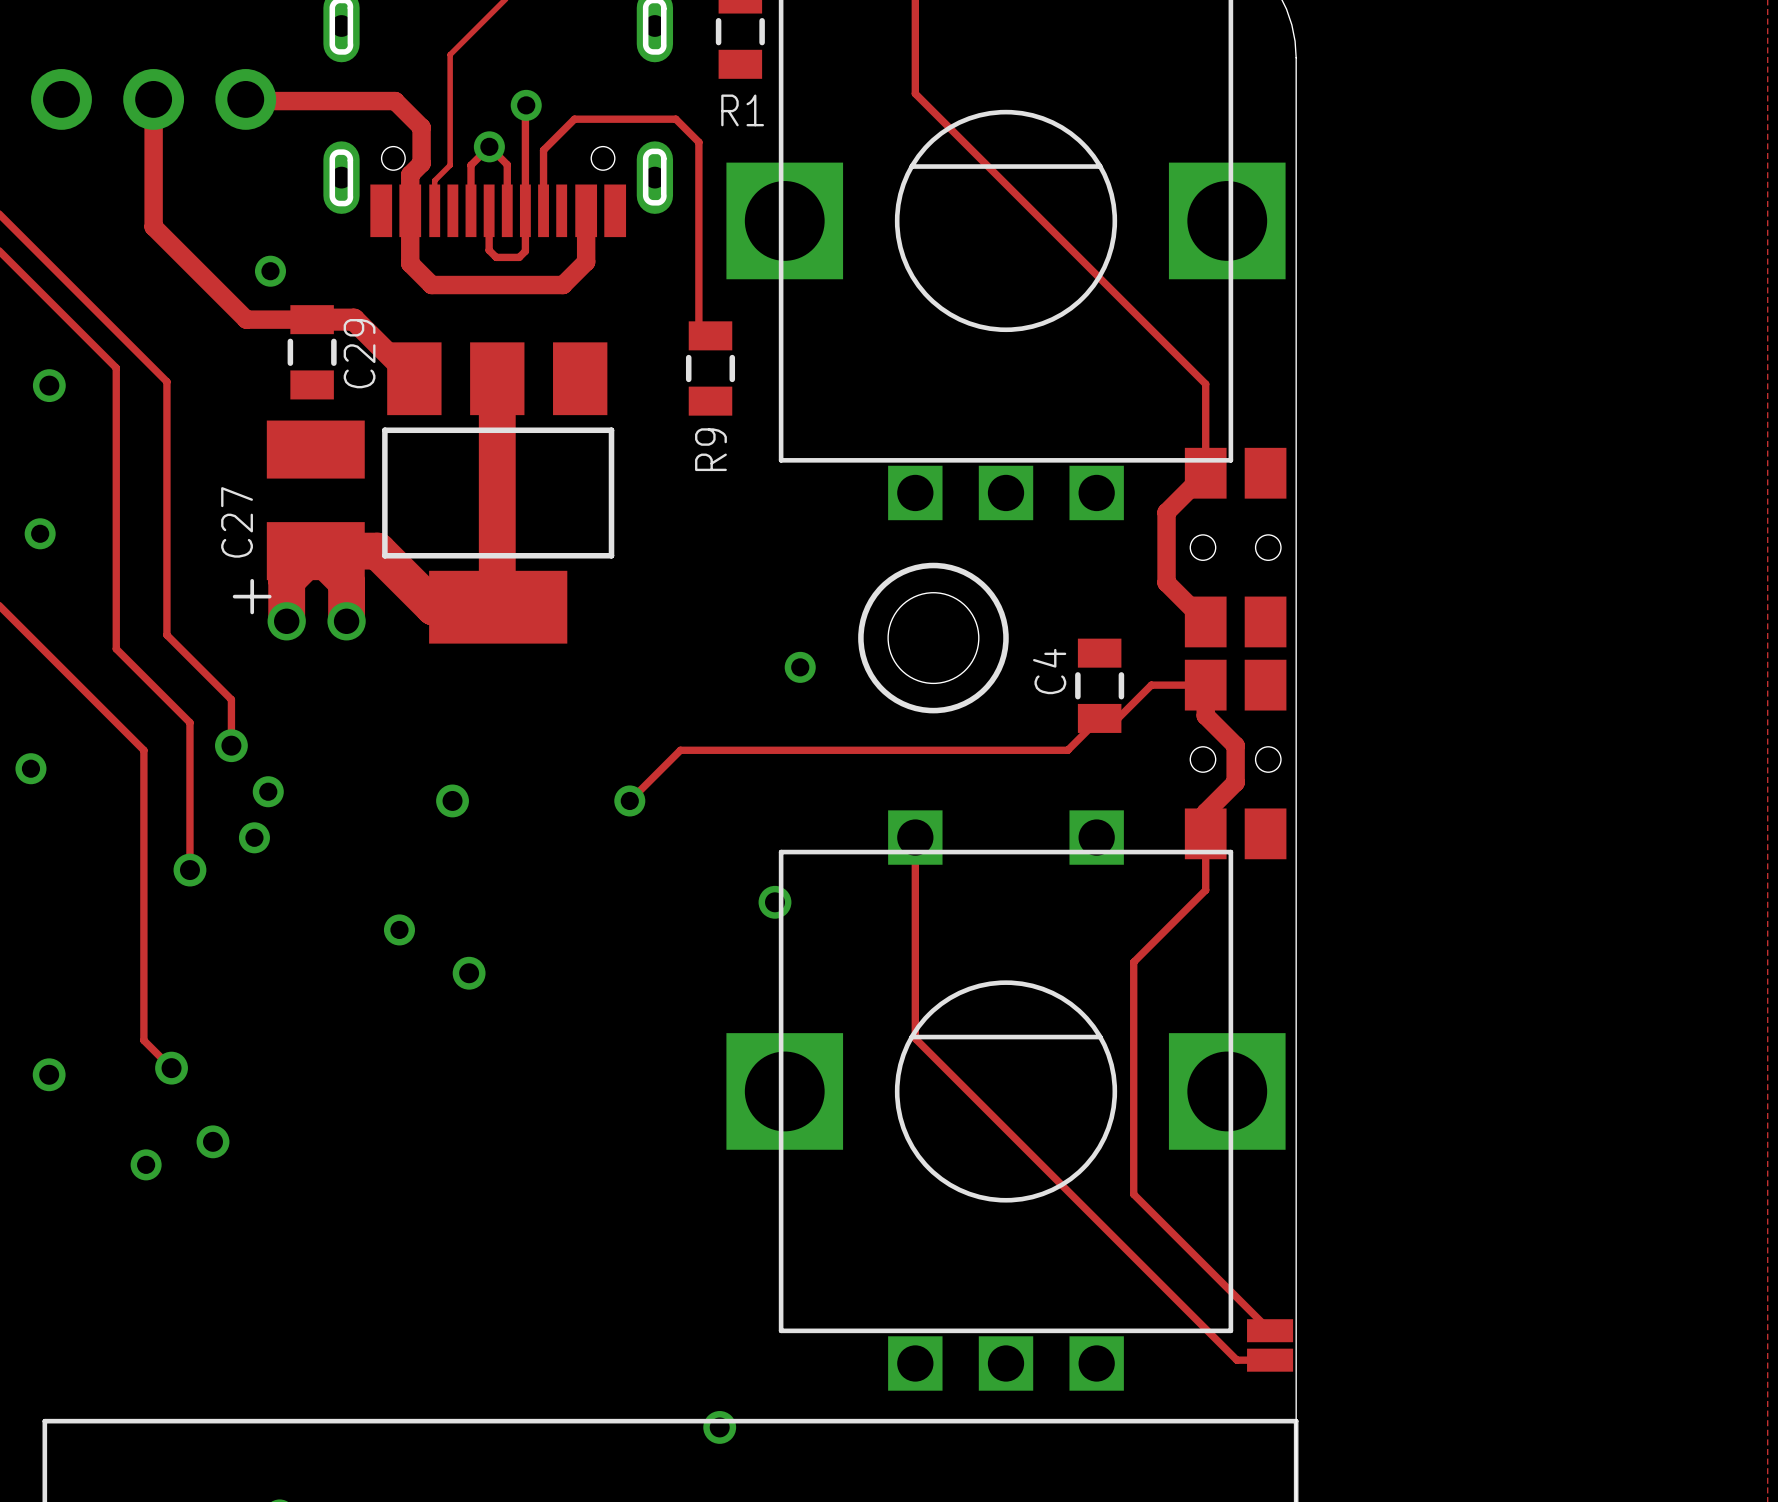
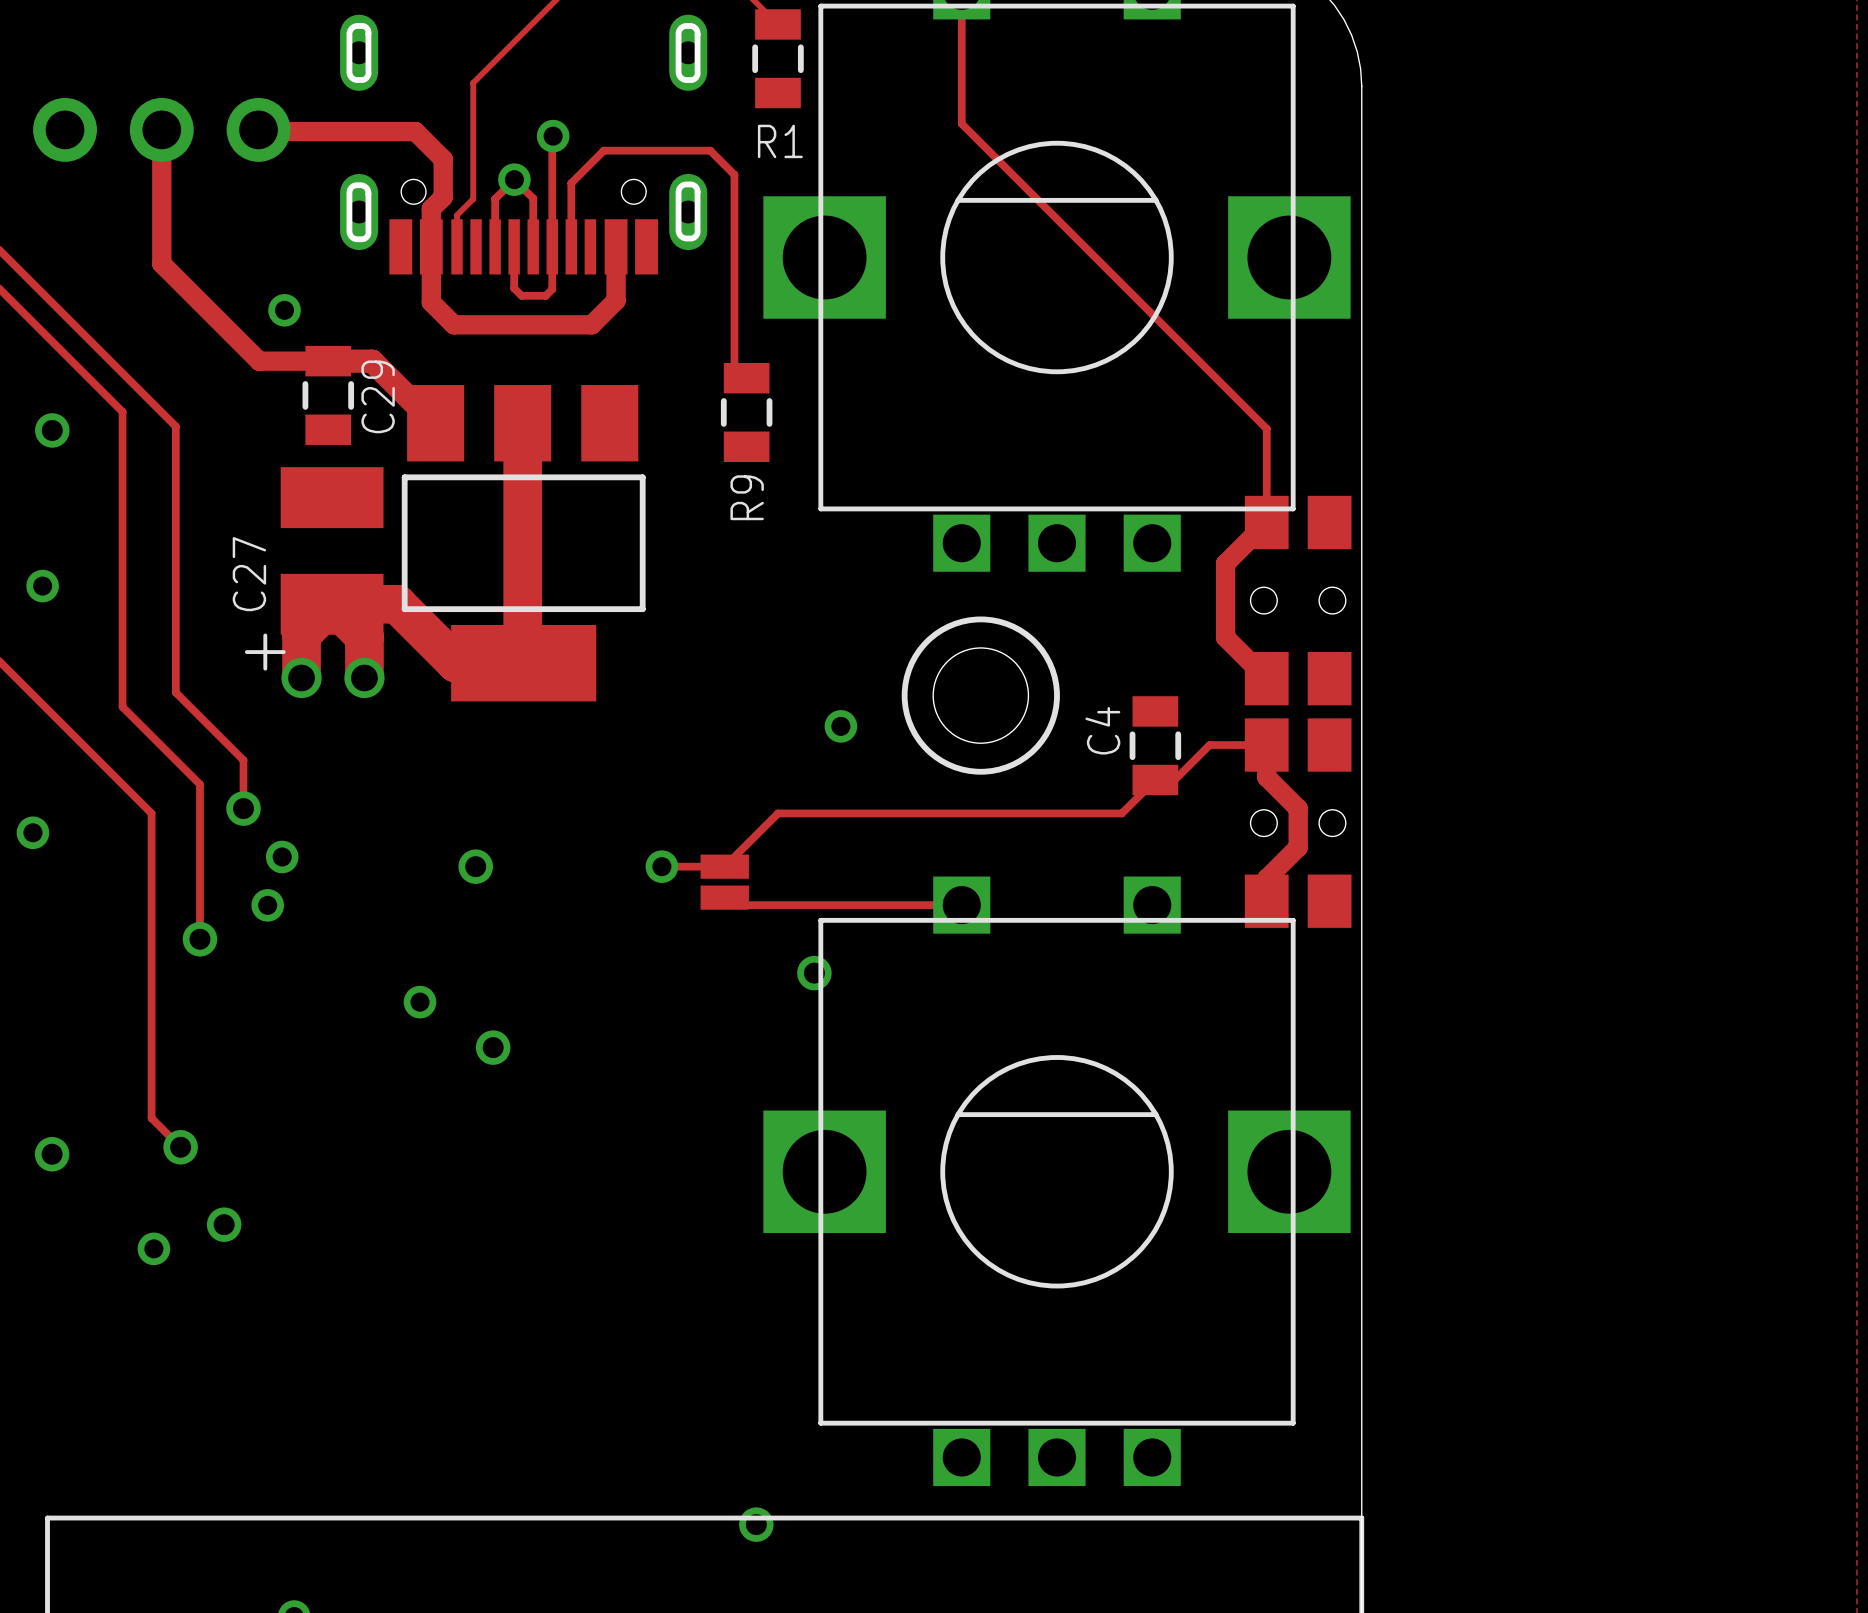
track: (740, 750) (680, 750) (629, 800) -> (777, 813) (724, 866) (661, 866)
track: (1205, 833) (1205, 890) (1133, 962) (1133, 1194) (1270, 1330) -> none
track: (915, 837) (915, 1038) (1236, 1360) (1270, 1360) -> (961, 905) (732, 905) (724, 897)
part position: (1270, 1345) -> (724, 882)

